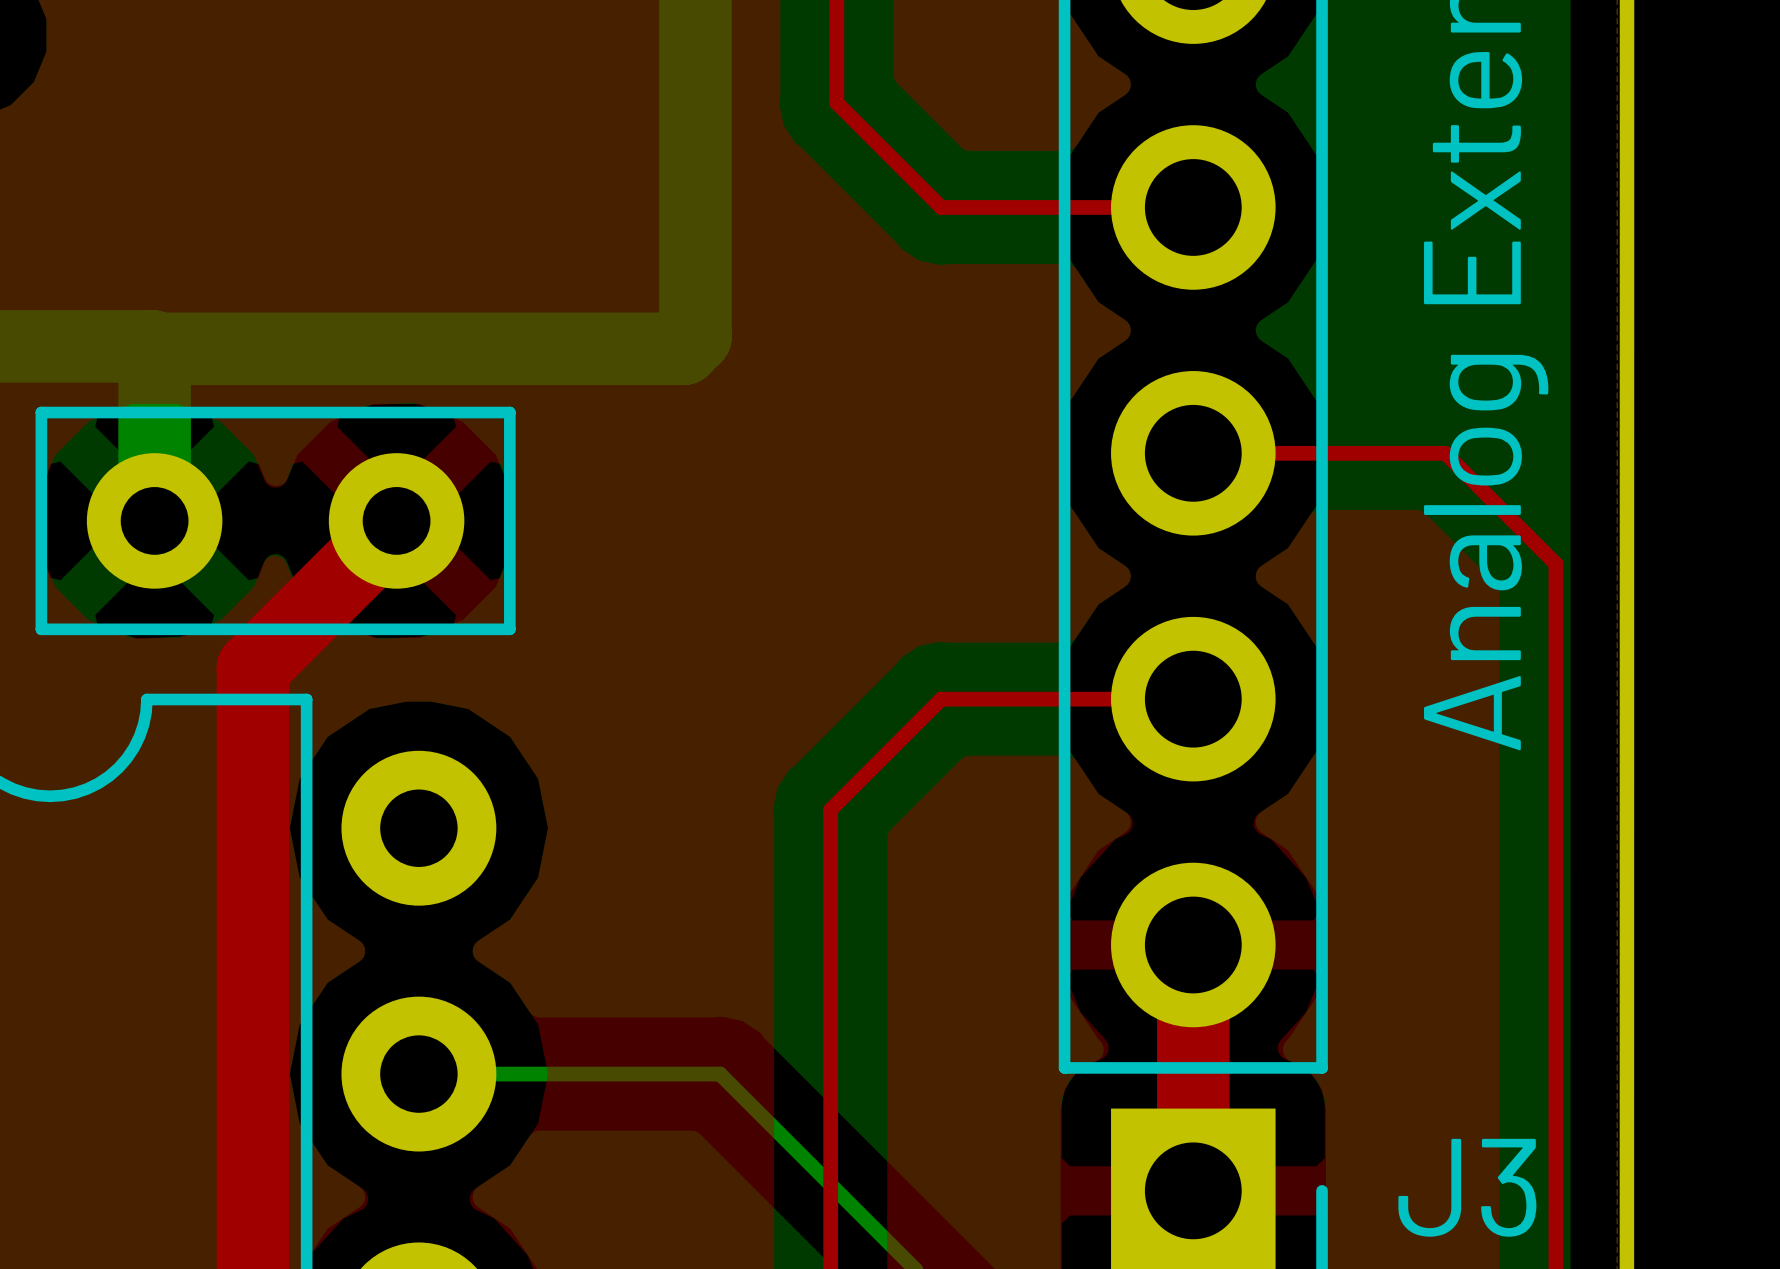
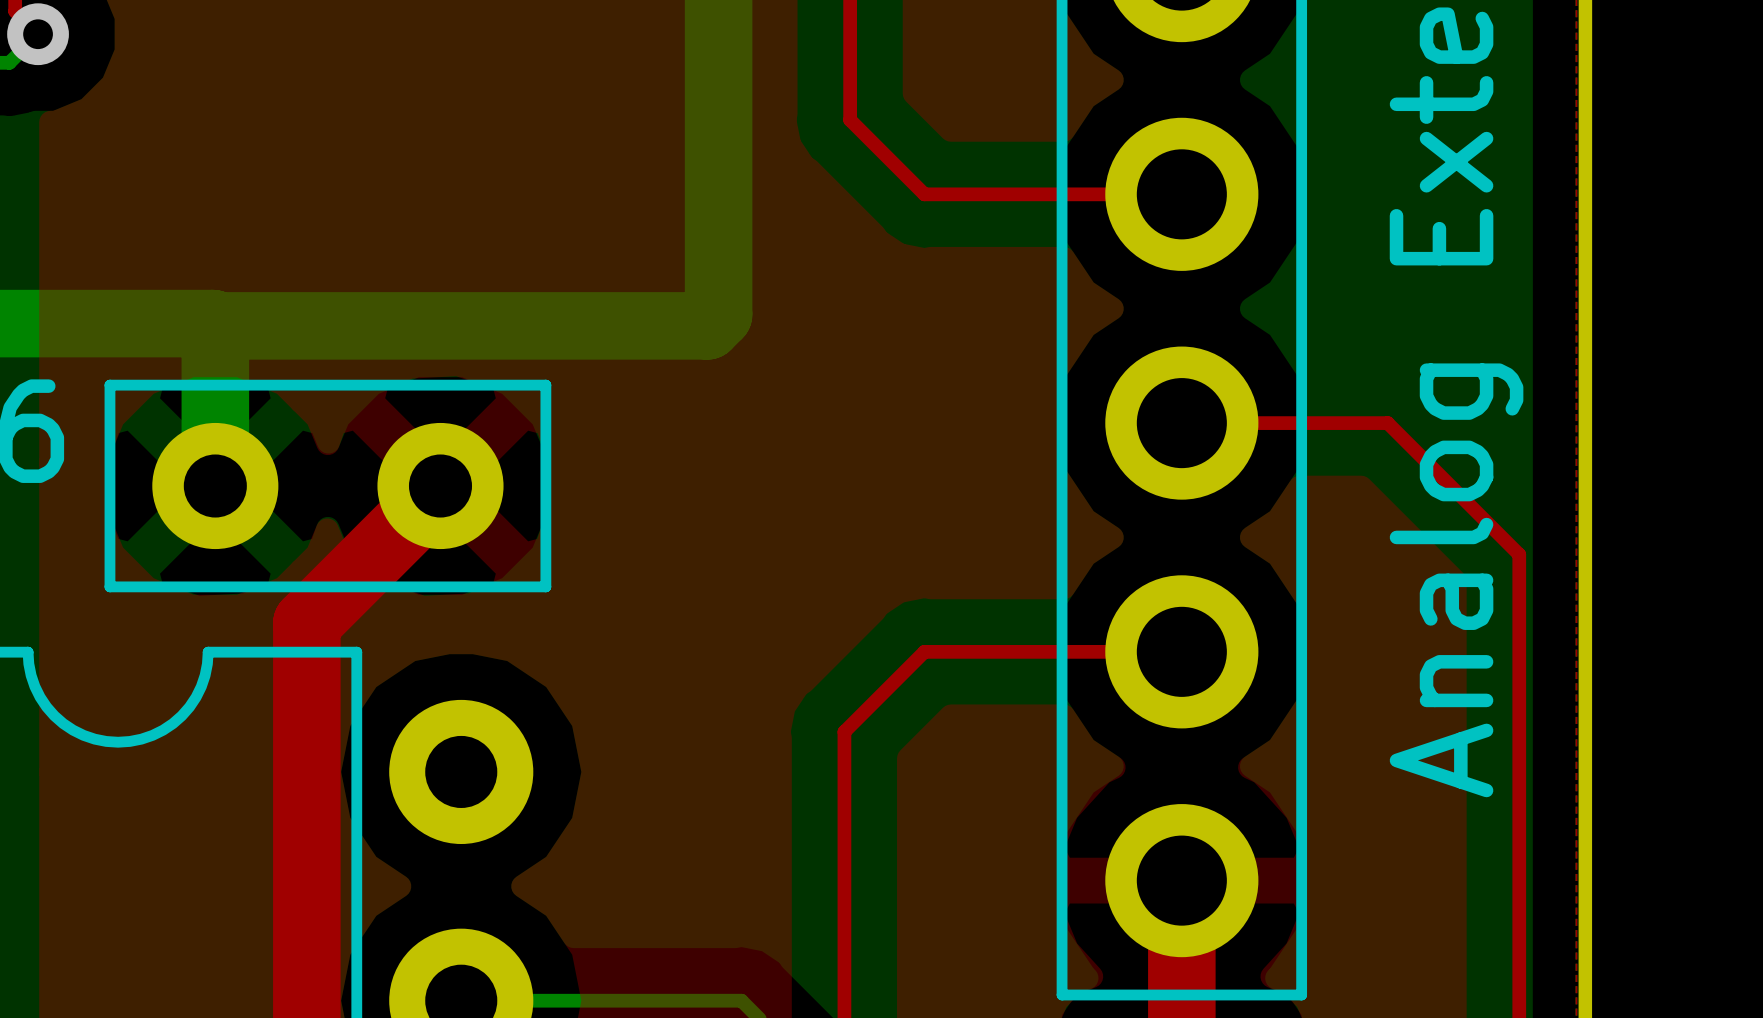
top track: (836, 102) (941, 207) -> (850, 97) (850, 119) (924, 194) (947, 194)
top track: (1414, 453) (1445, 453) (1555, 563) (1555, 594) -> (1387, 423) (1519, 554)
top track: (941, 699) (830, 809) -> (947, 651) (924, 651) (844, 731) (844, 754)

